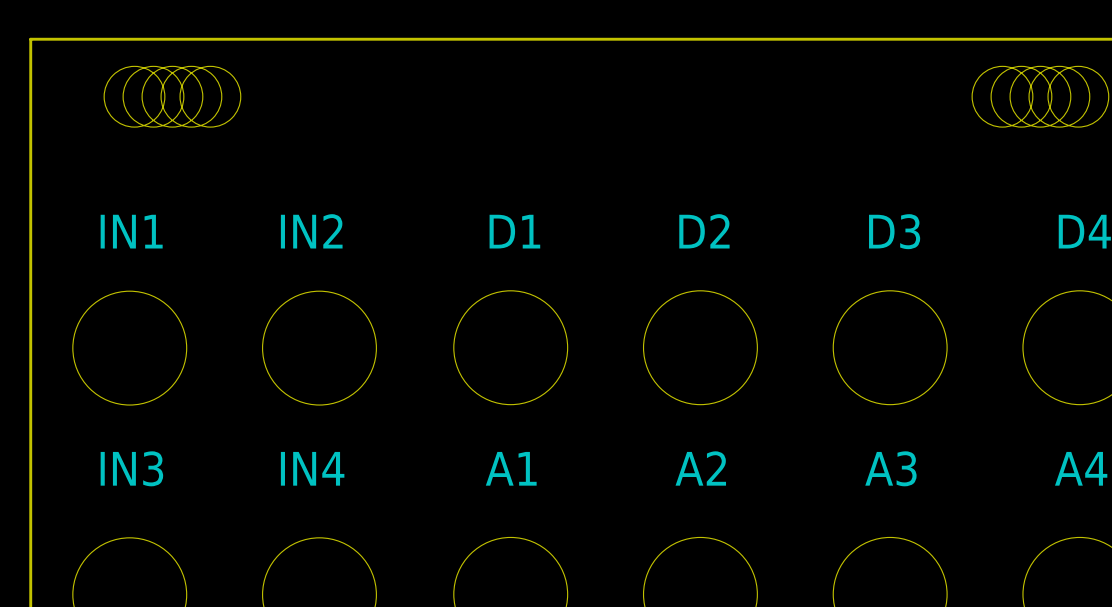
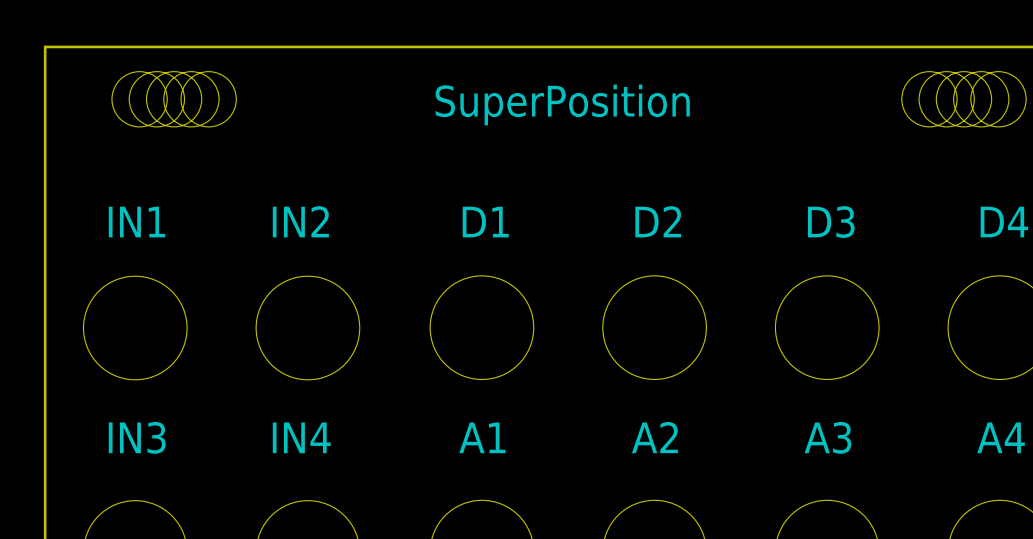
text: none -> SuperPosition (562, 104)

